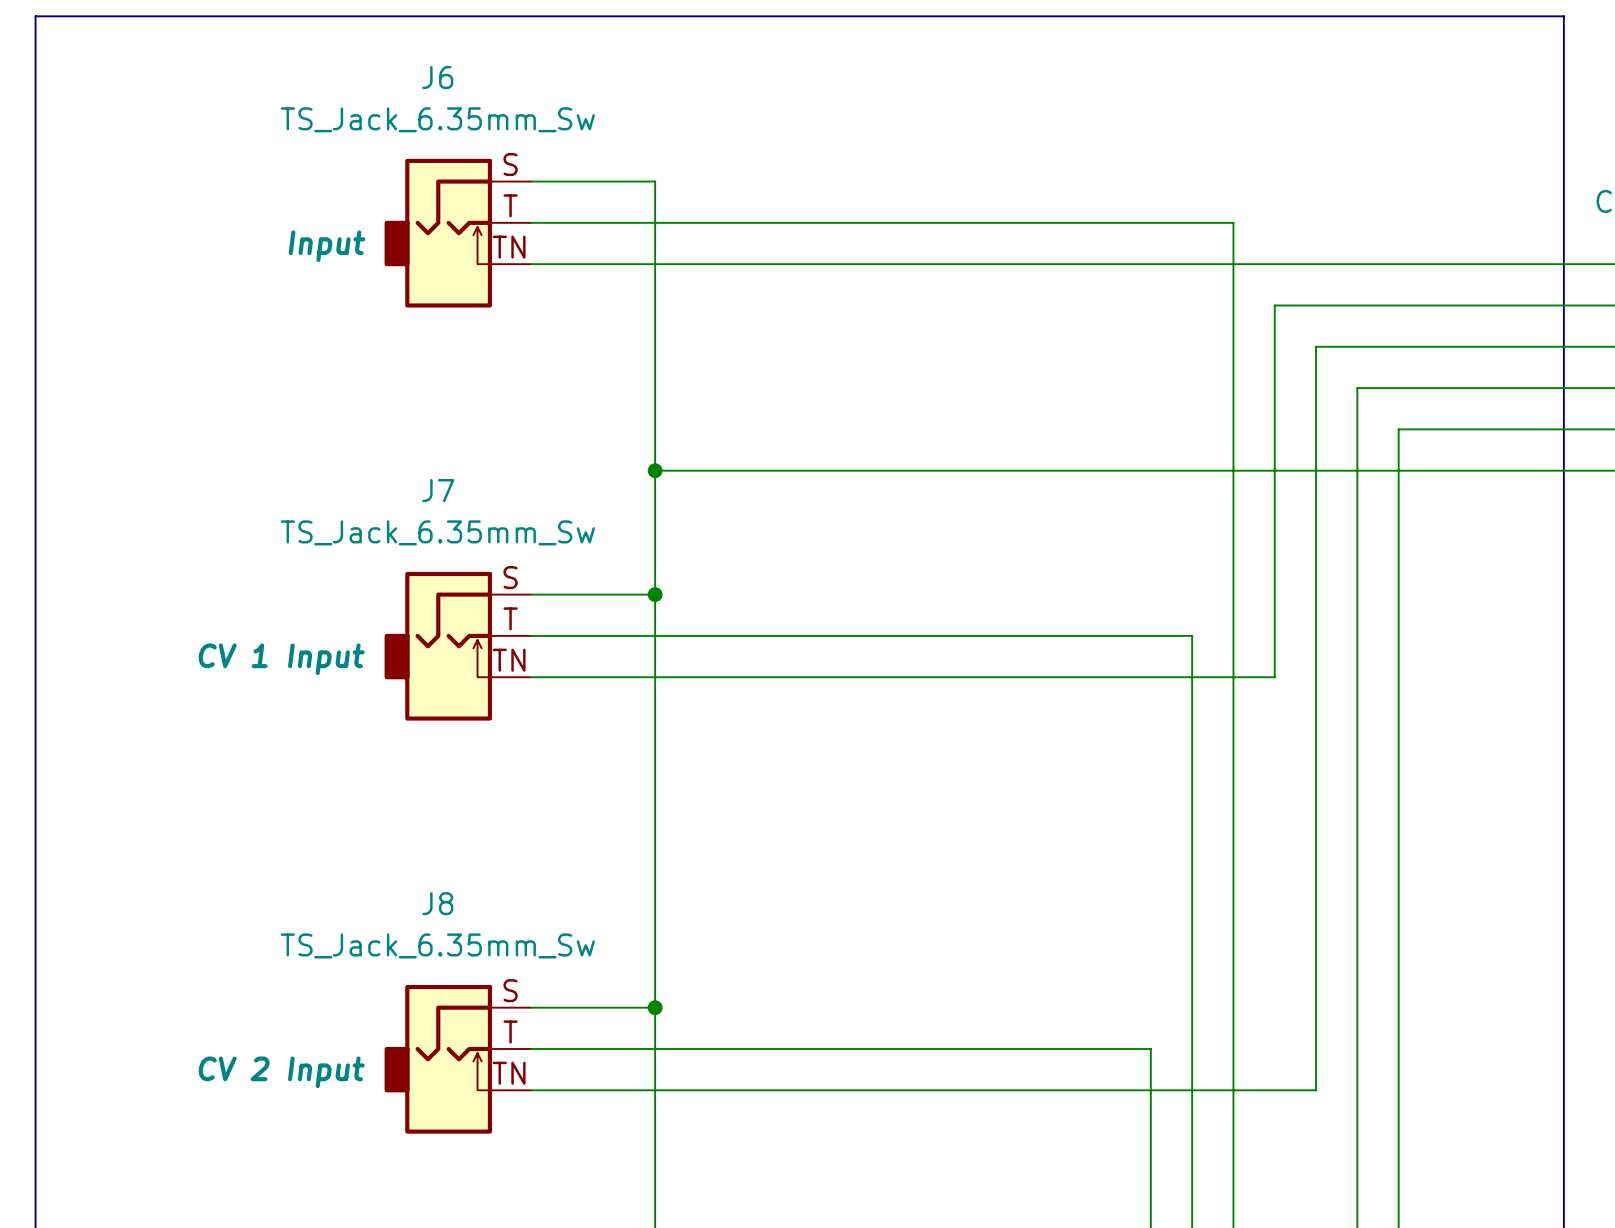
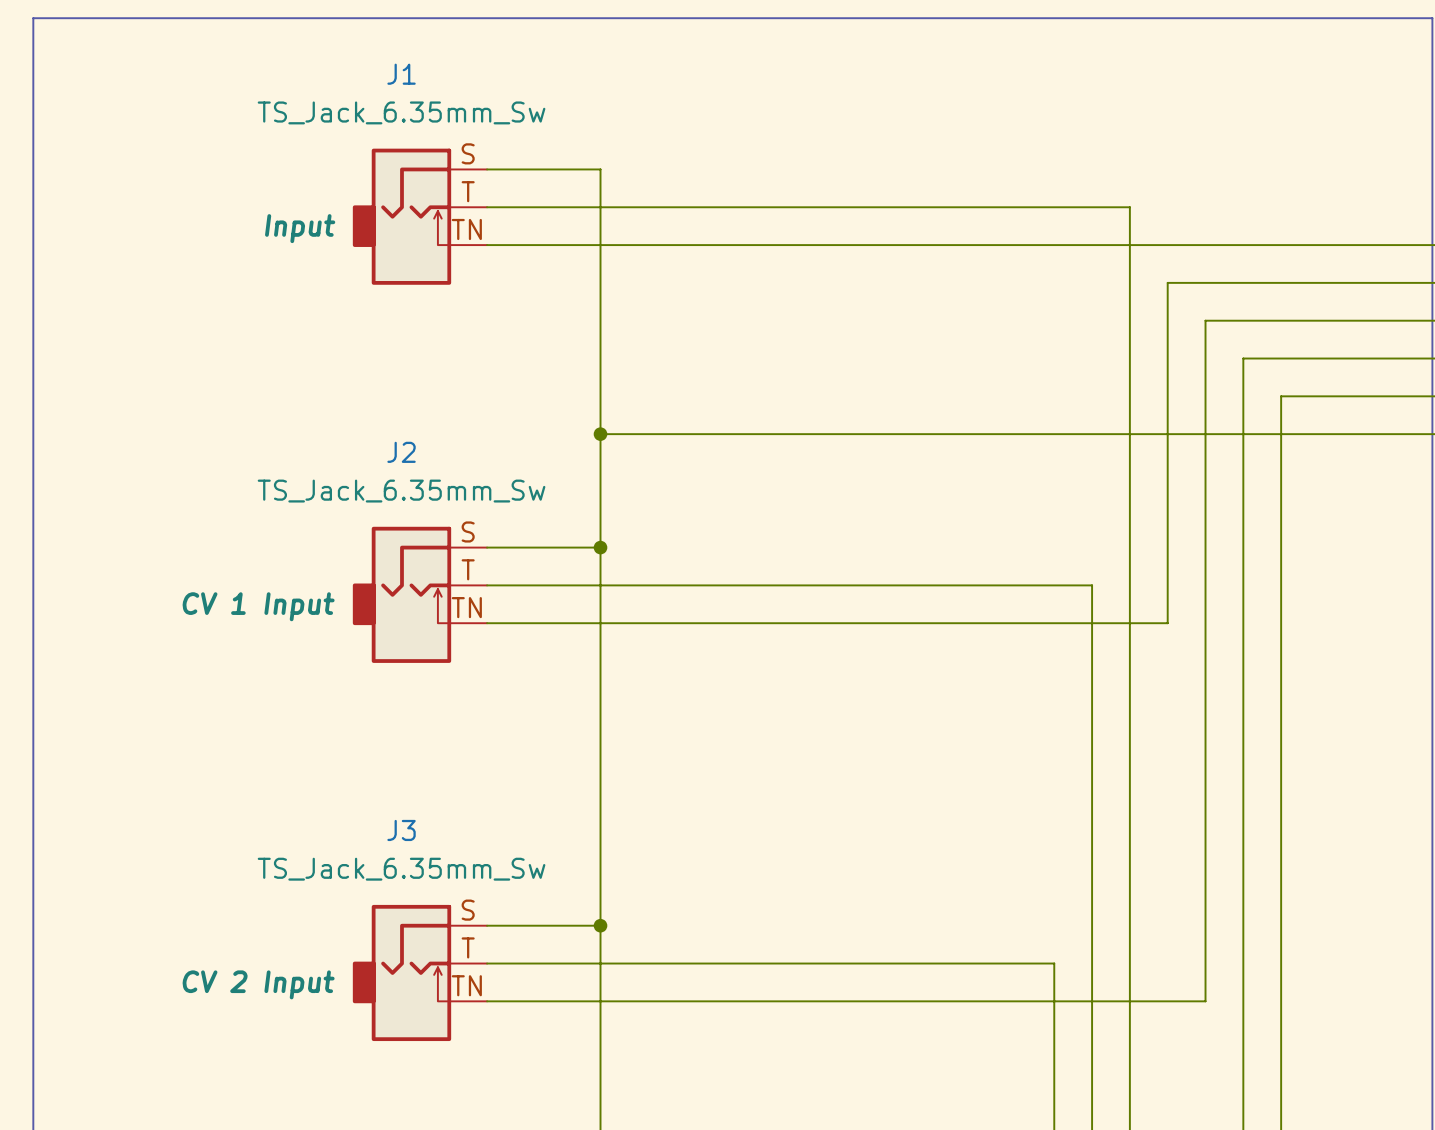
J6 name: J6 (437, 77) -> J1 (401, 74)
J7 name: J7 (438, 490) -> J2 (401, 452)
J8 name: J8 (437, 903) -> J3 (401, 830)

